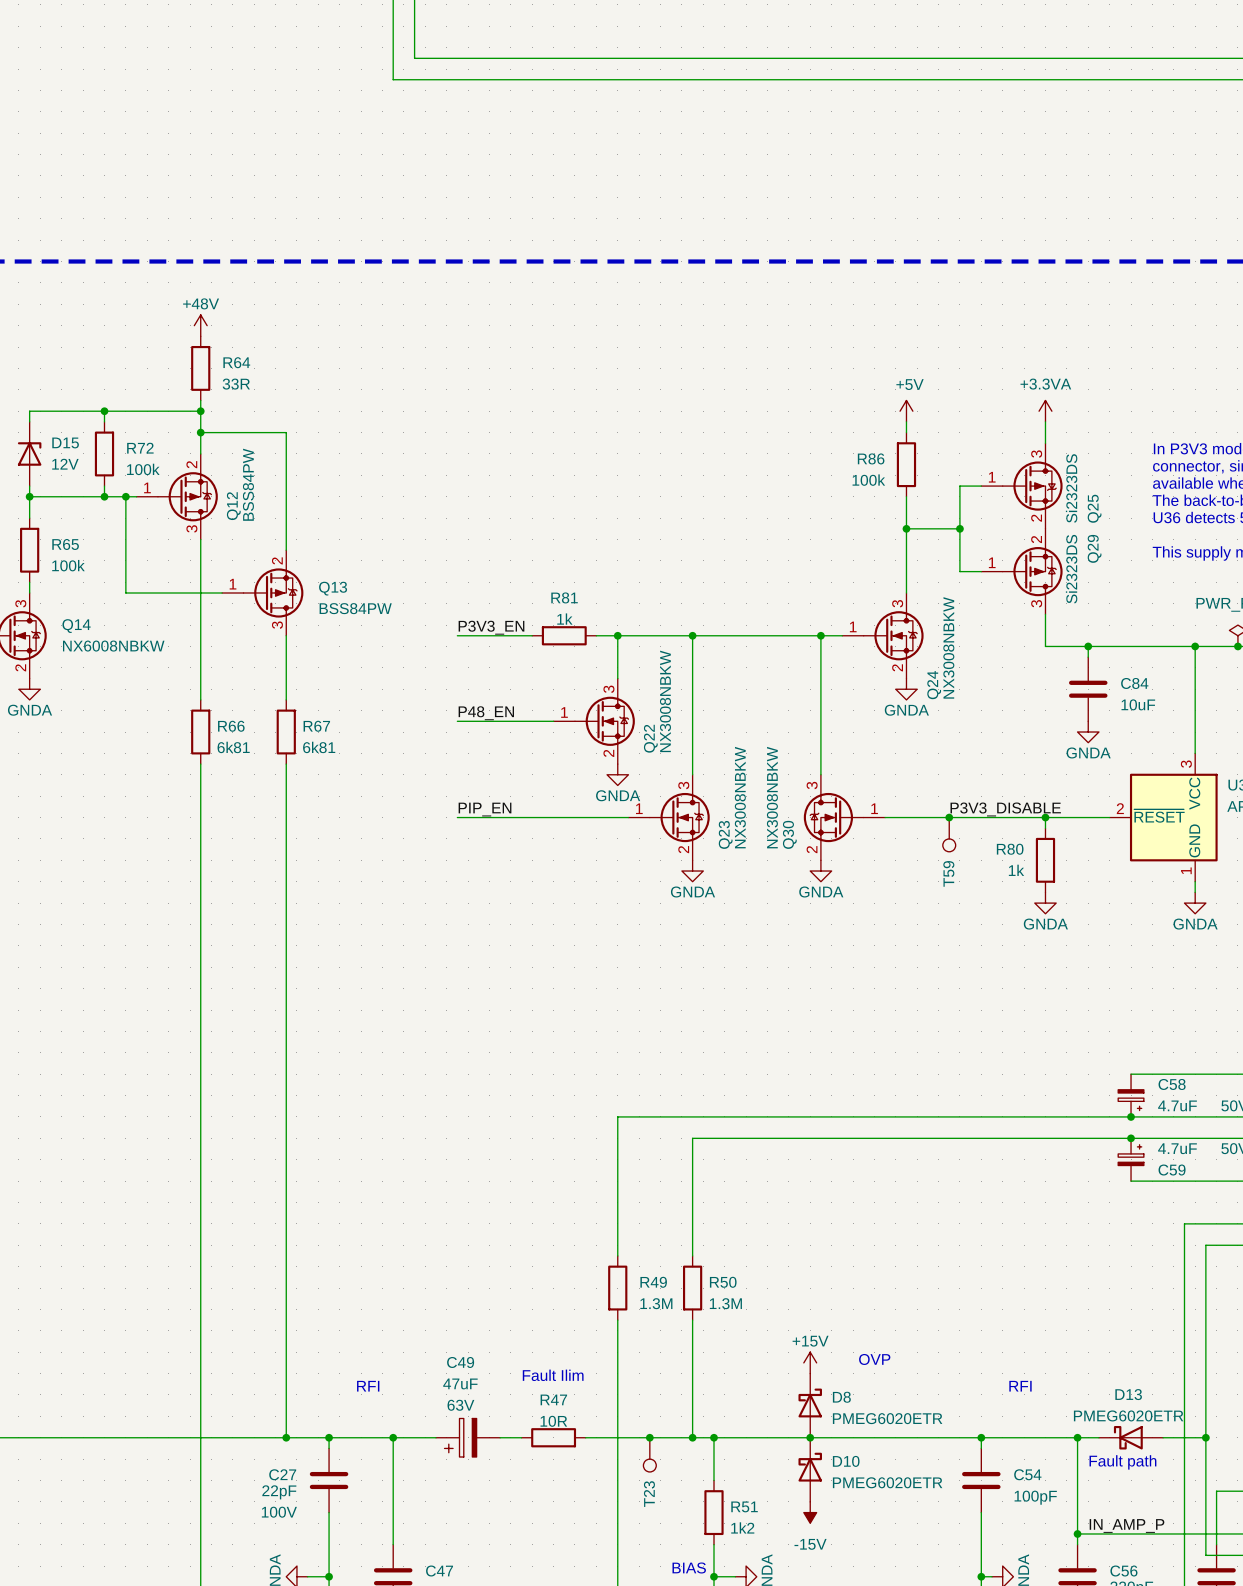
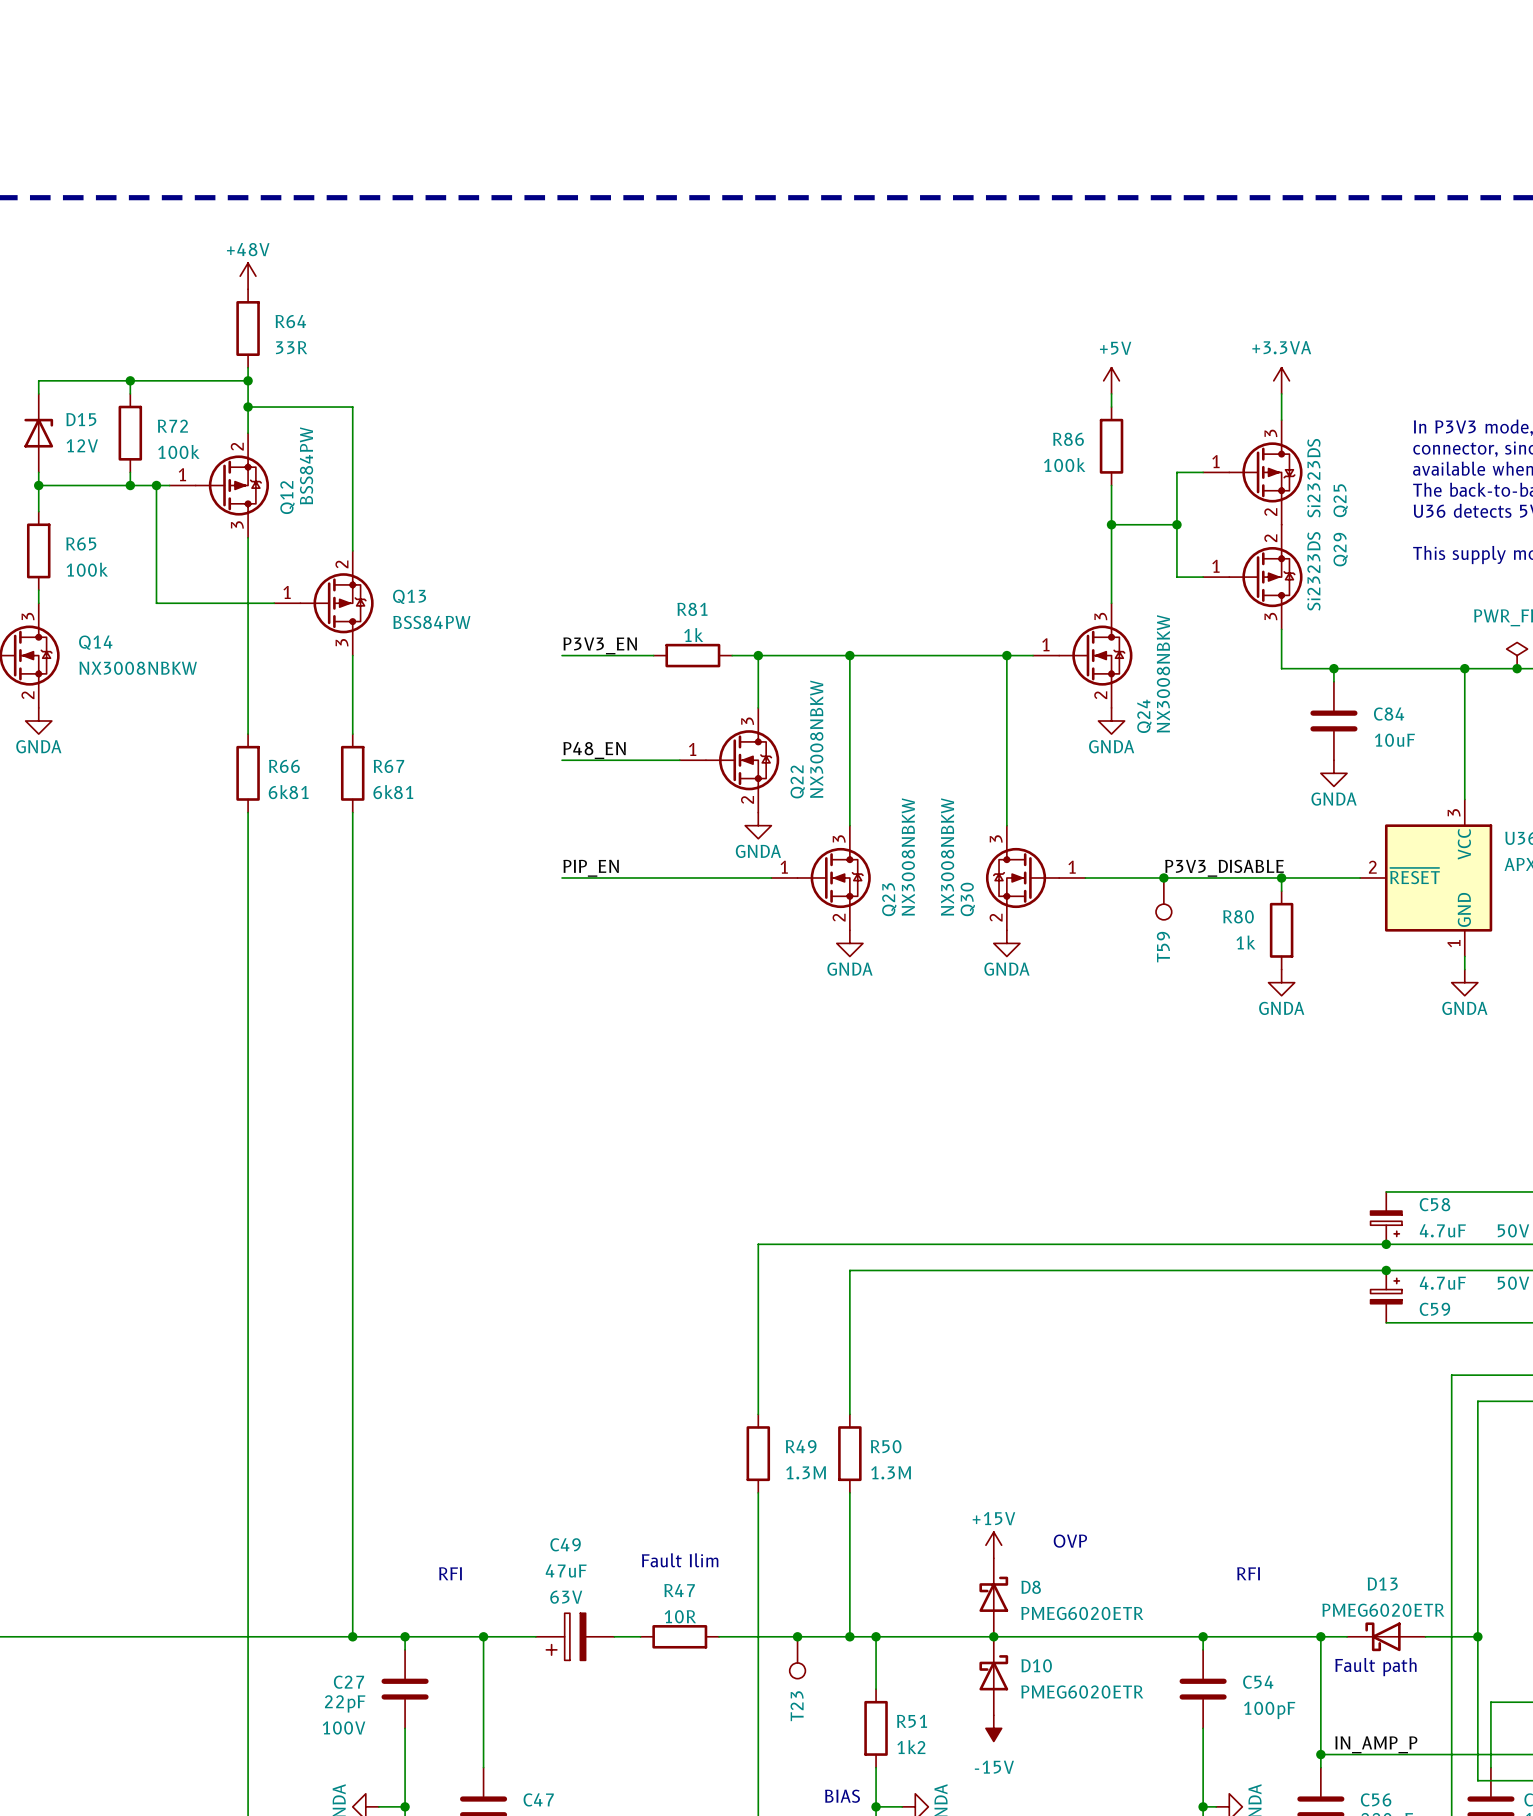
Q14 value: NX6008NBKW (113, 646) -> NX3008NBKW (138, 668)

